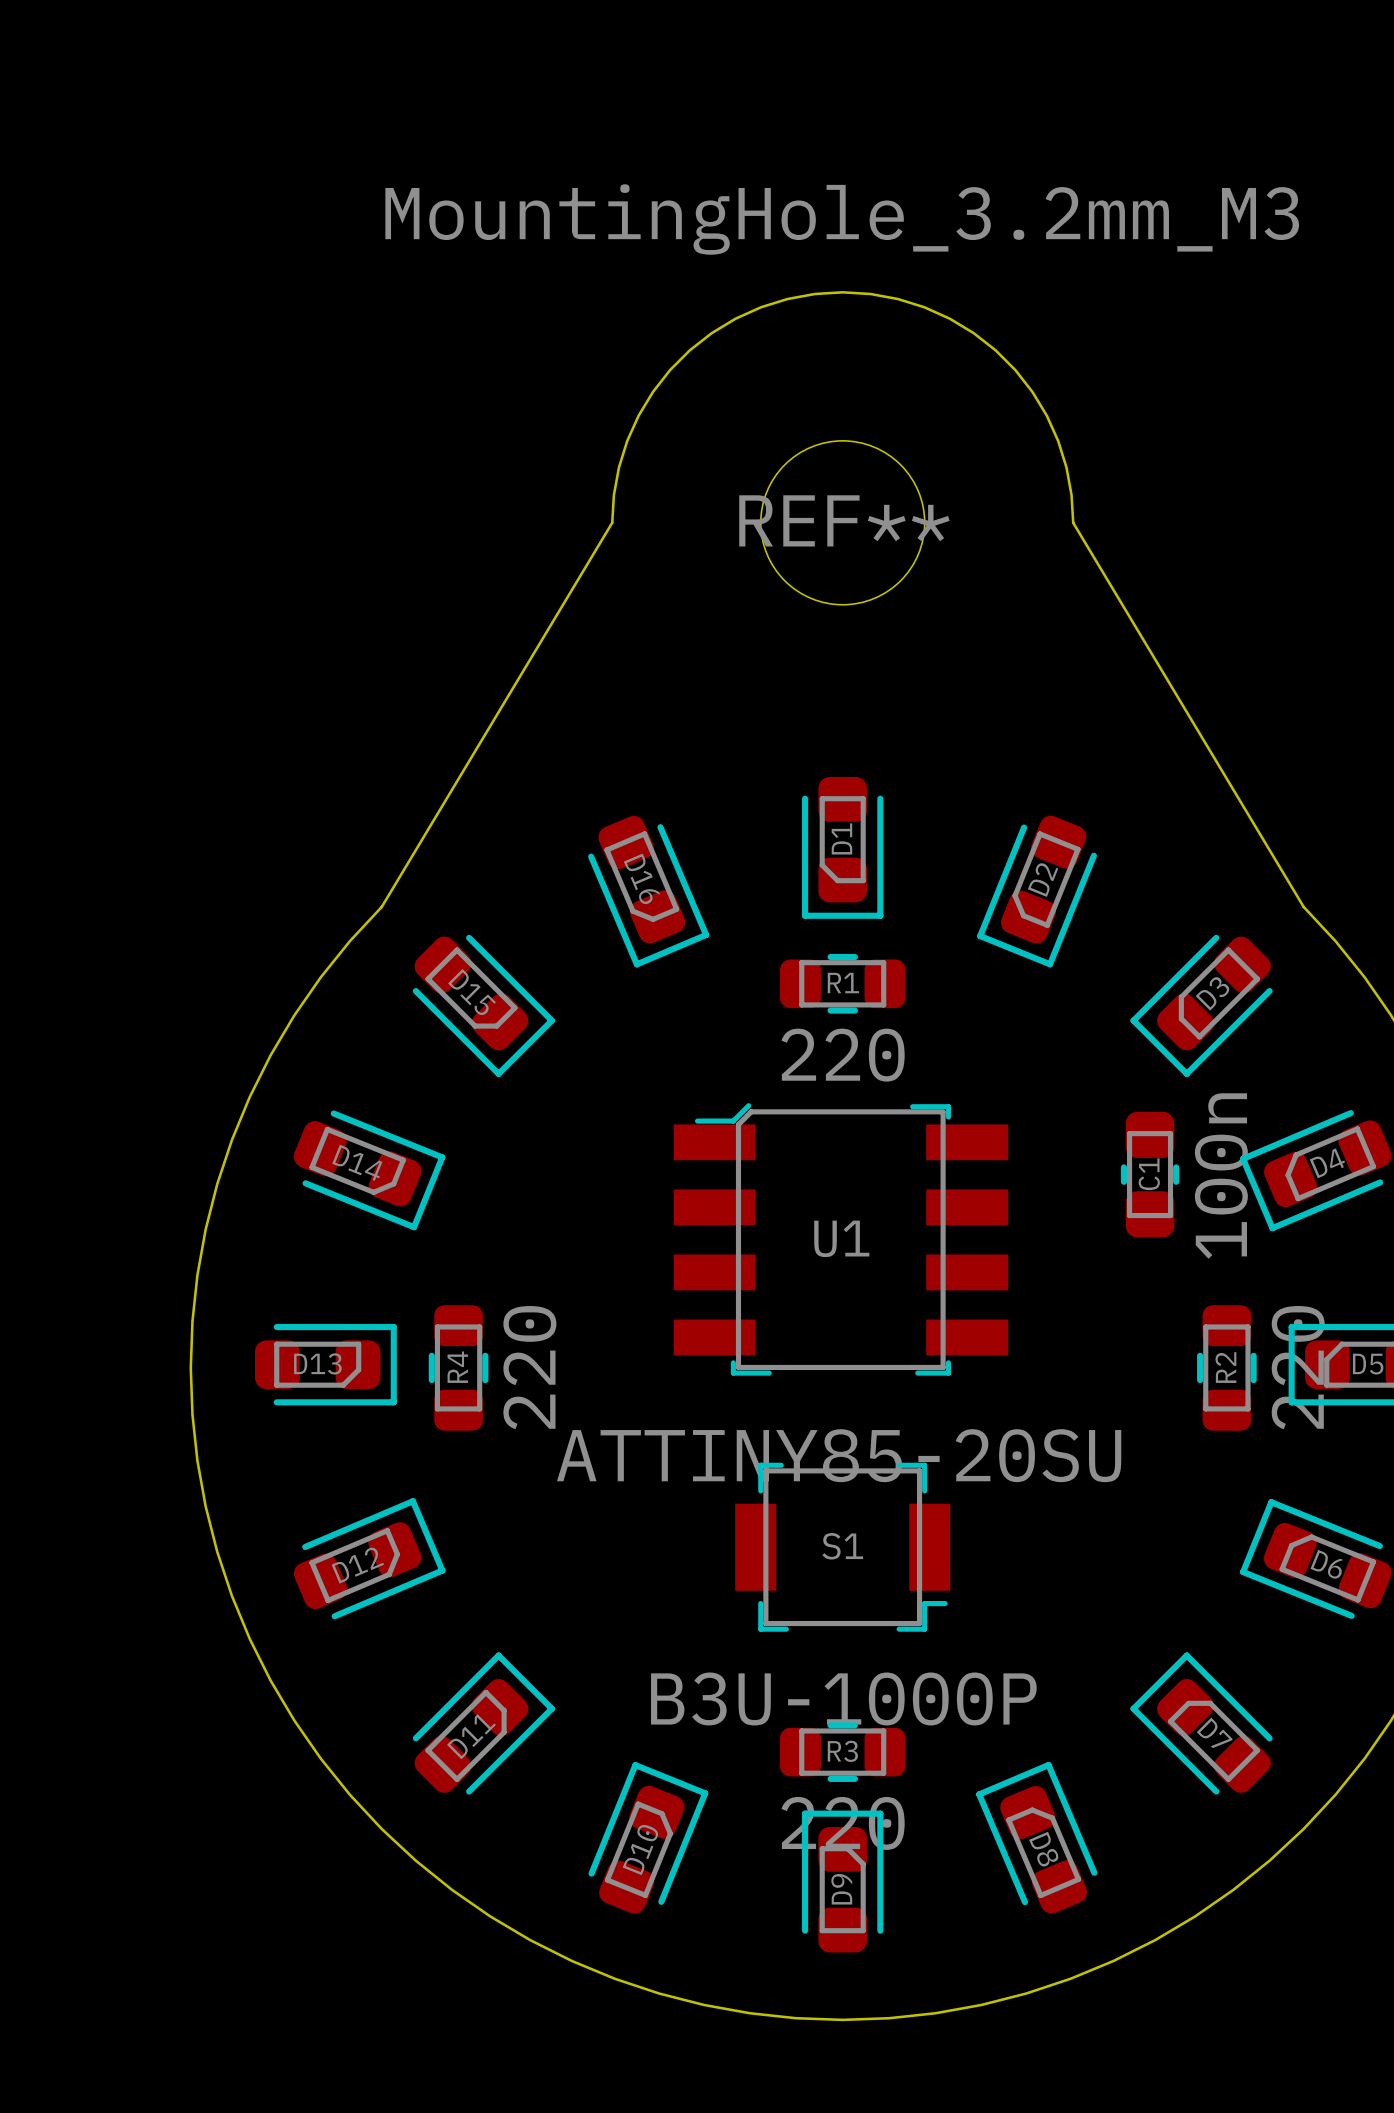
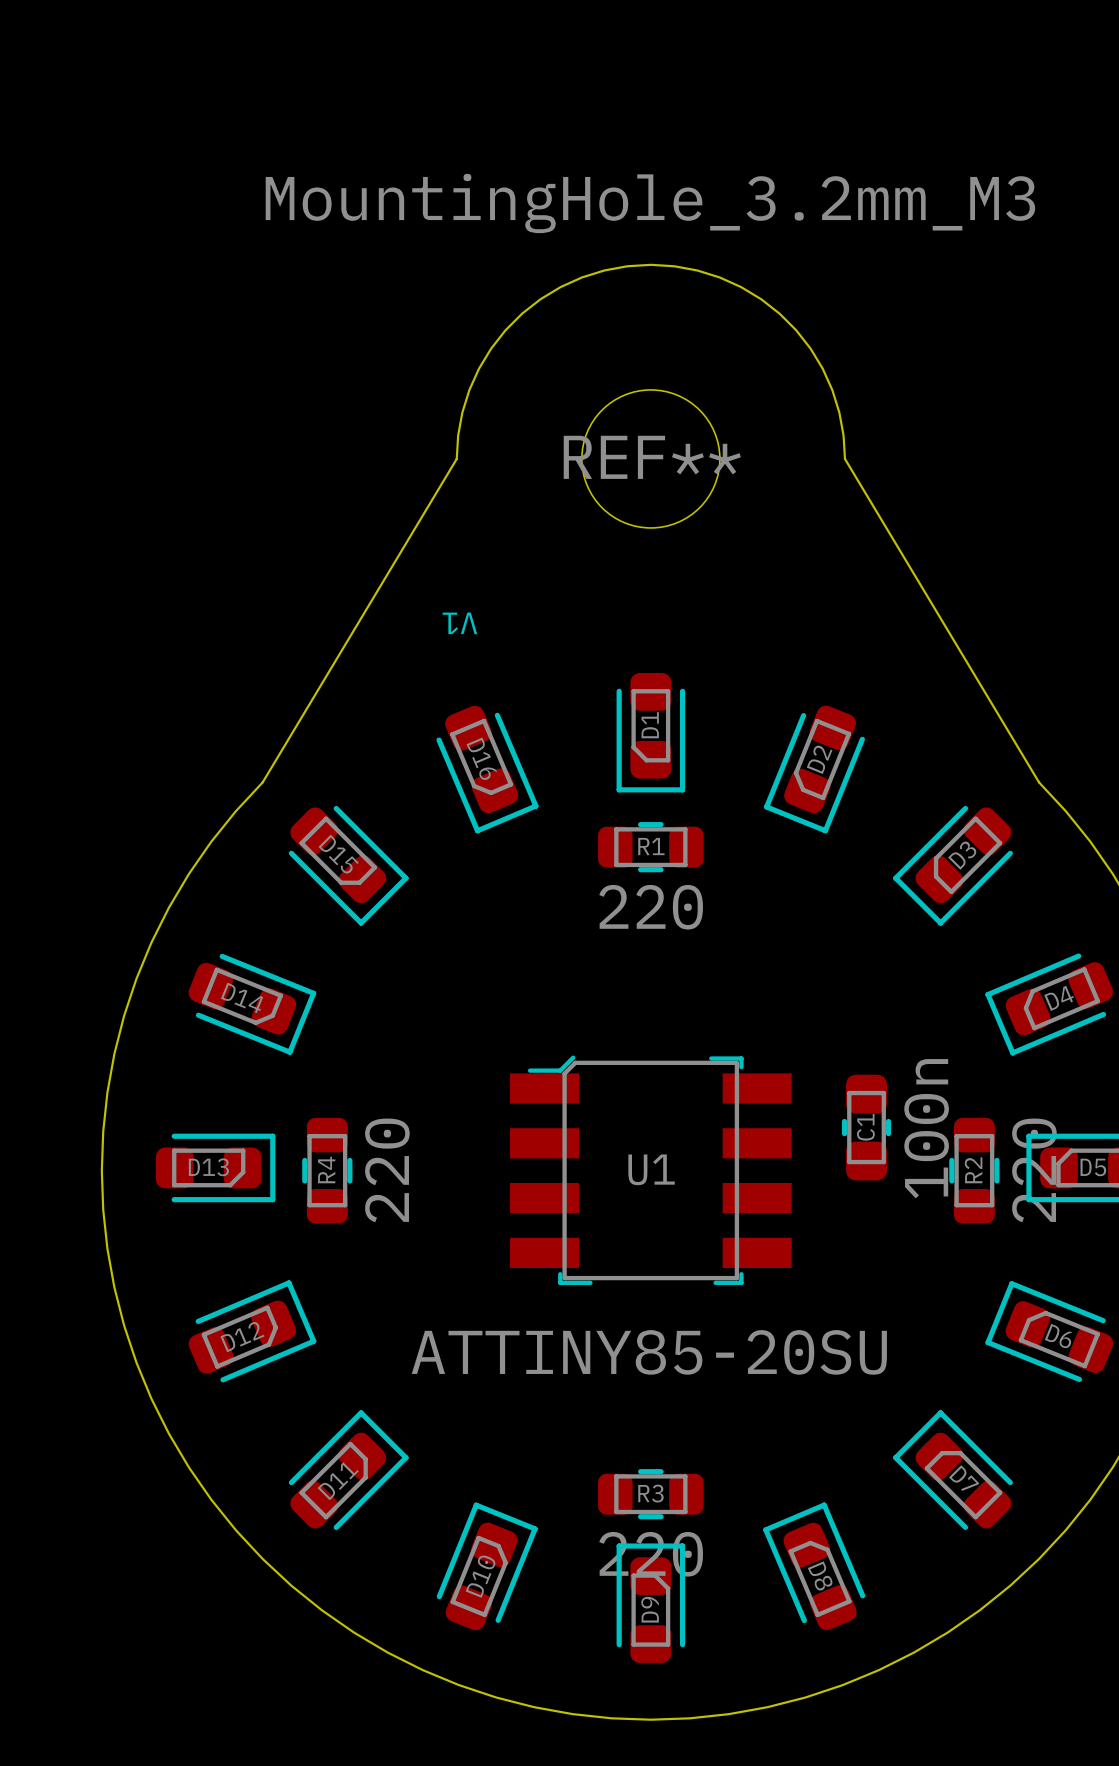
text: none -> V1 (459, 623)
C1 position: (1150, 1174) -> (866, 1127)
U1 position: (840, 1239) -> (650, 1170)
S1: B3U-1000P (842, 1547) -> none

